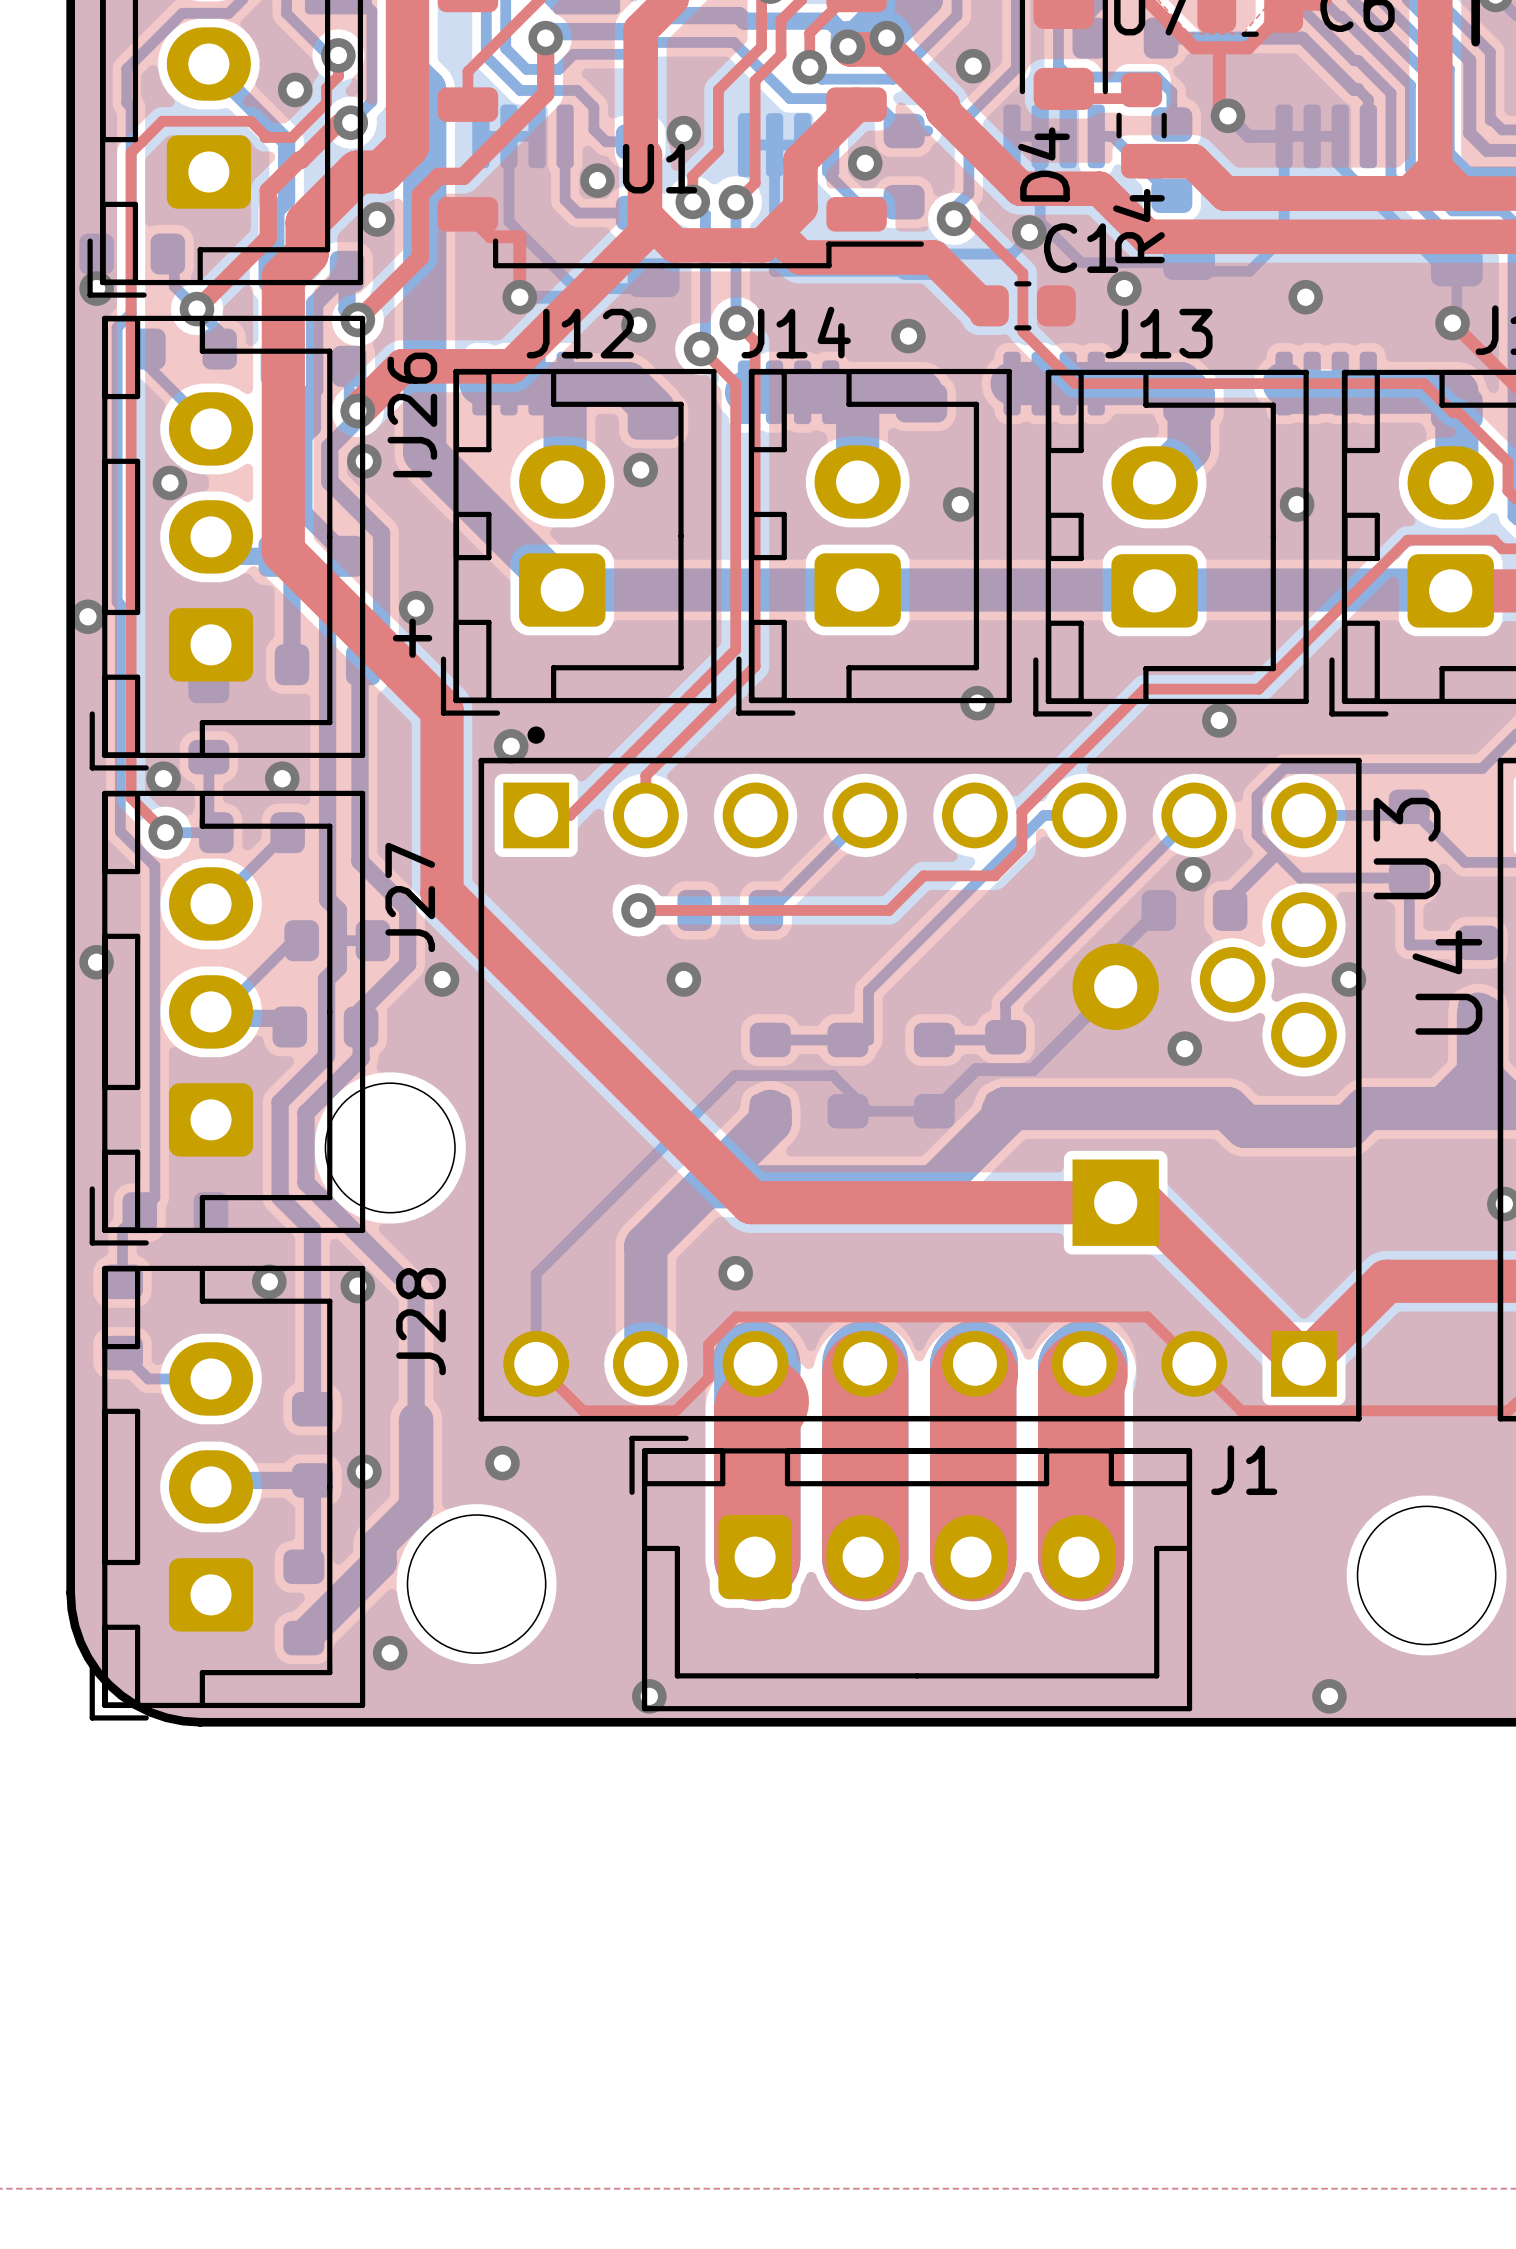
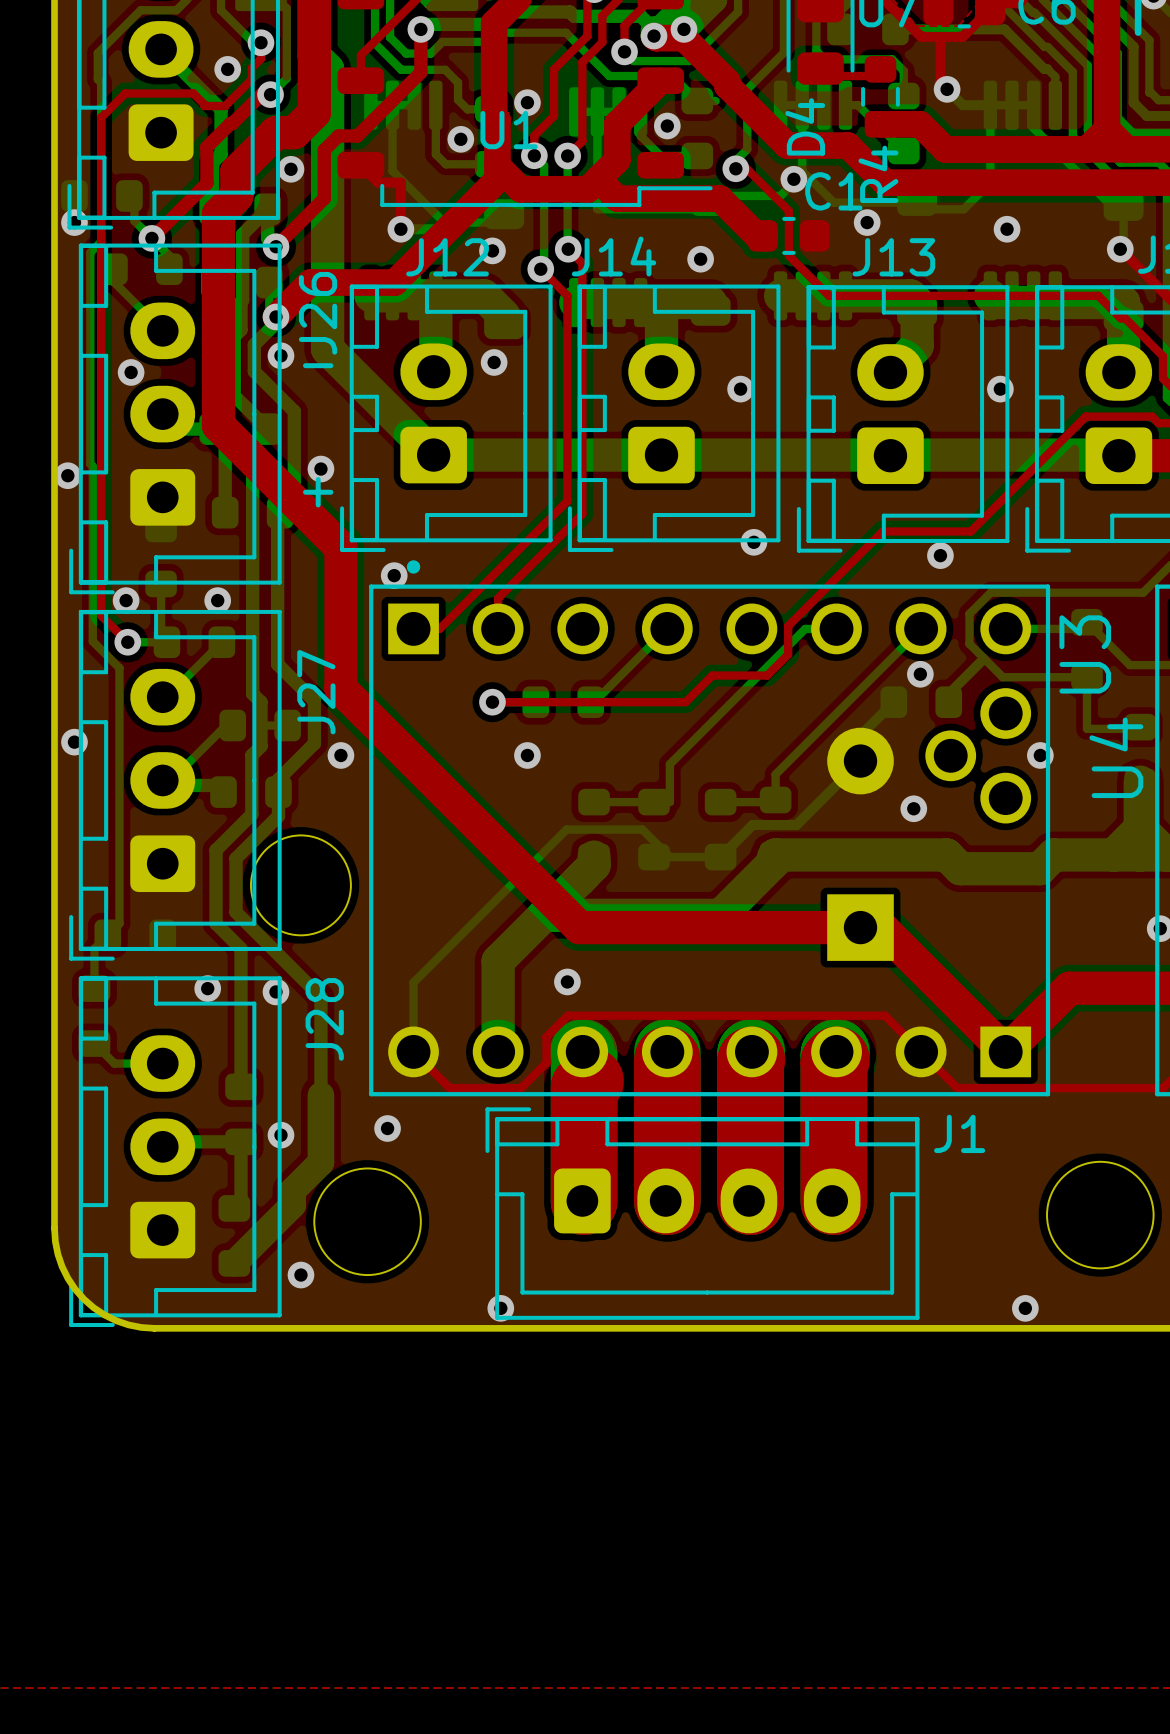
via: (973, 66) -> none

